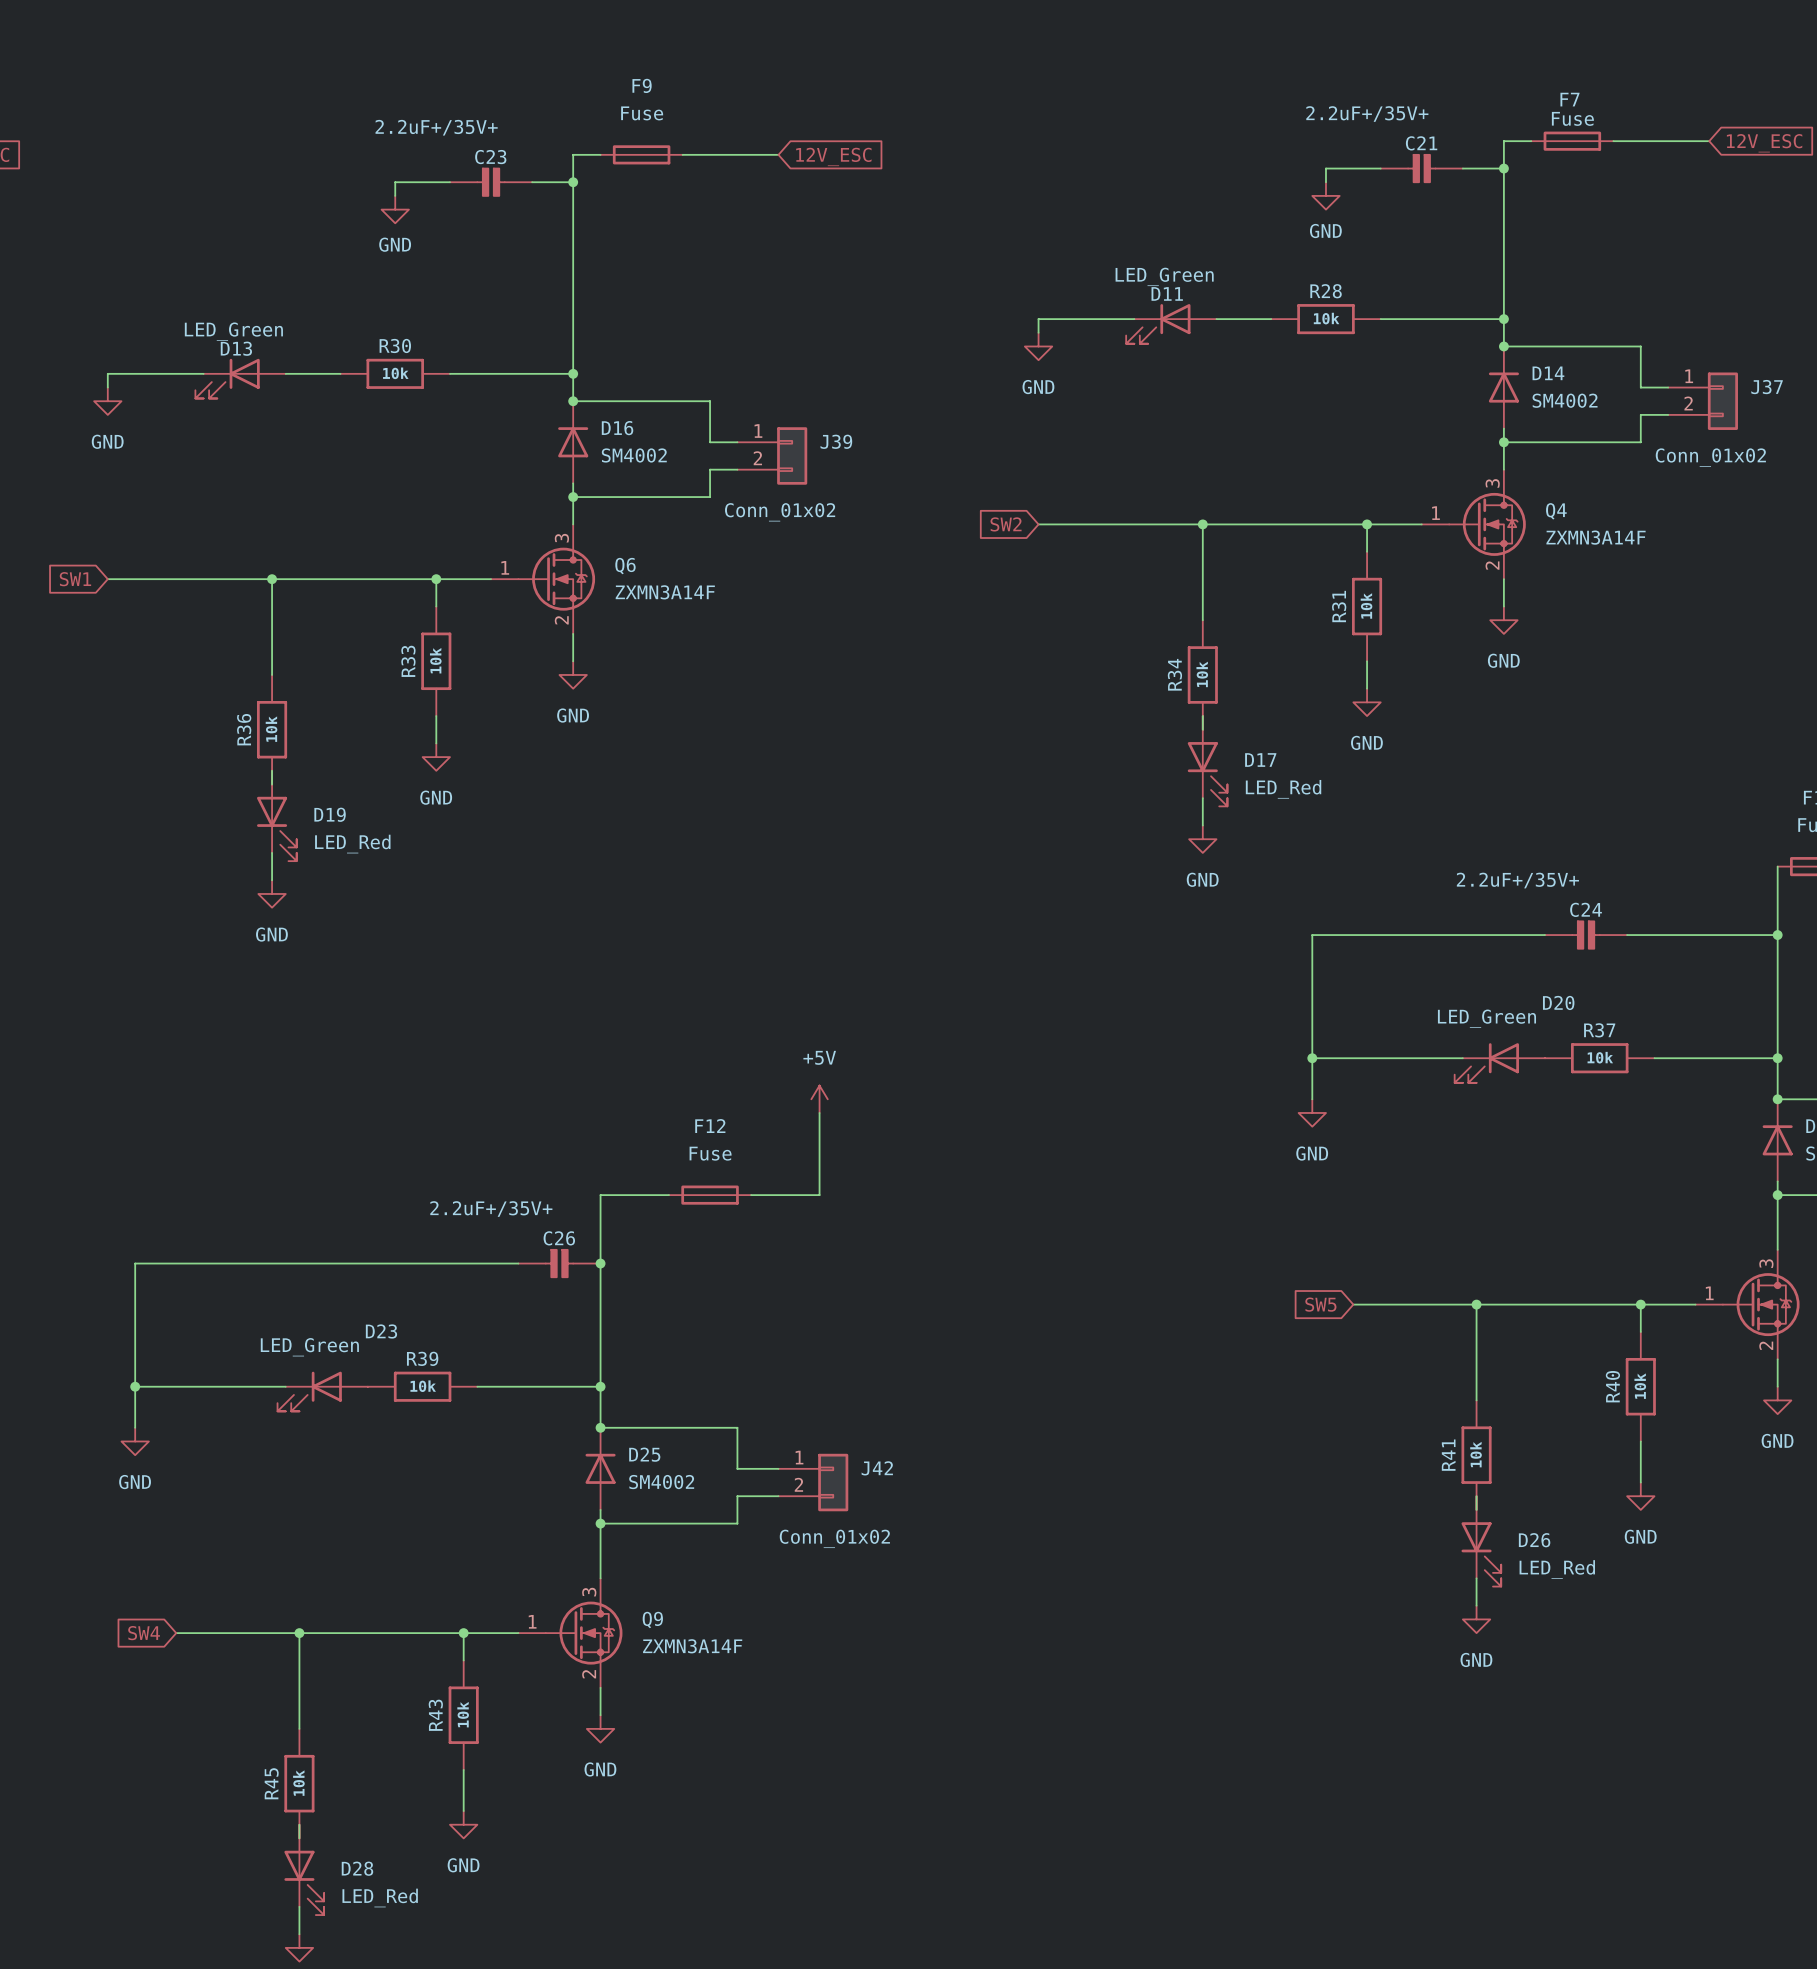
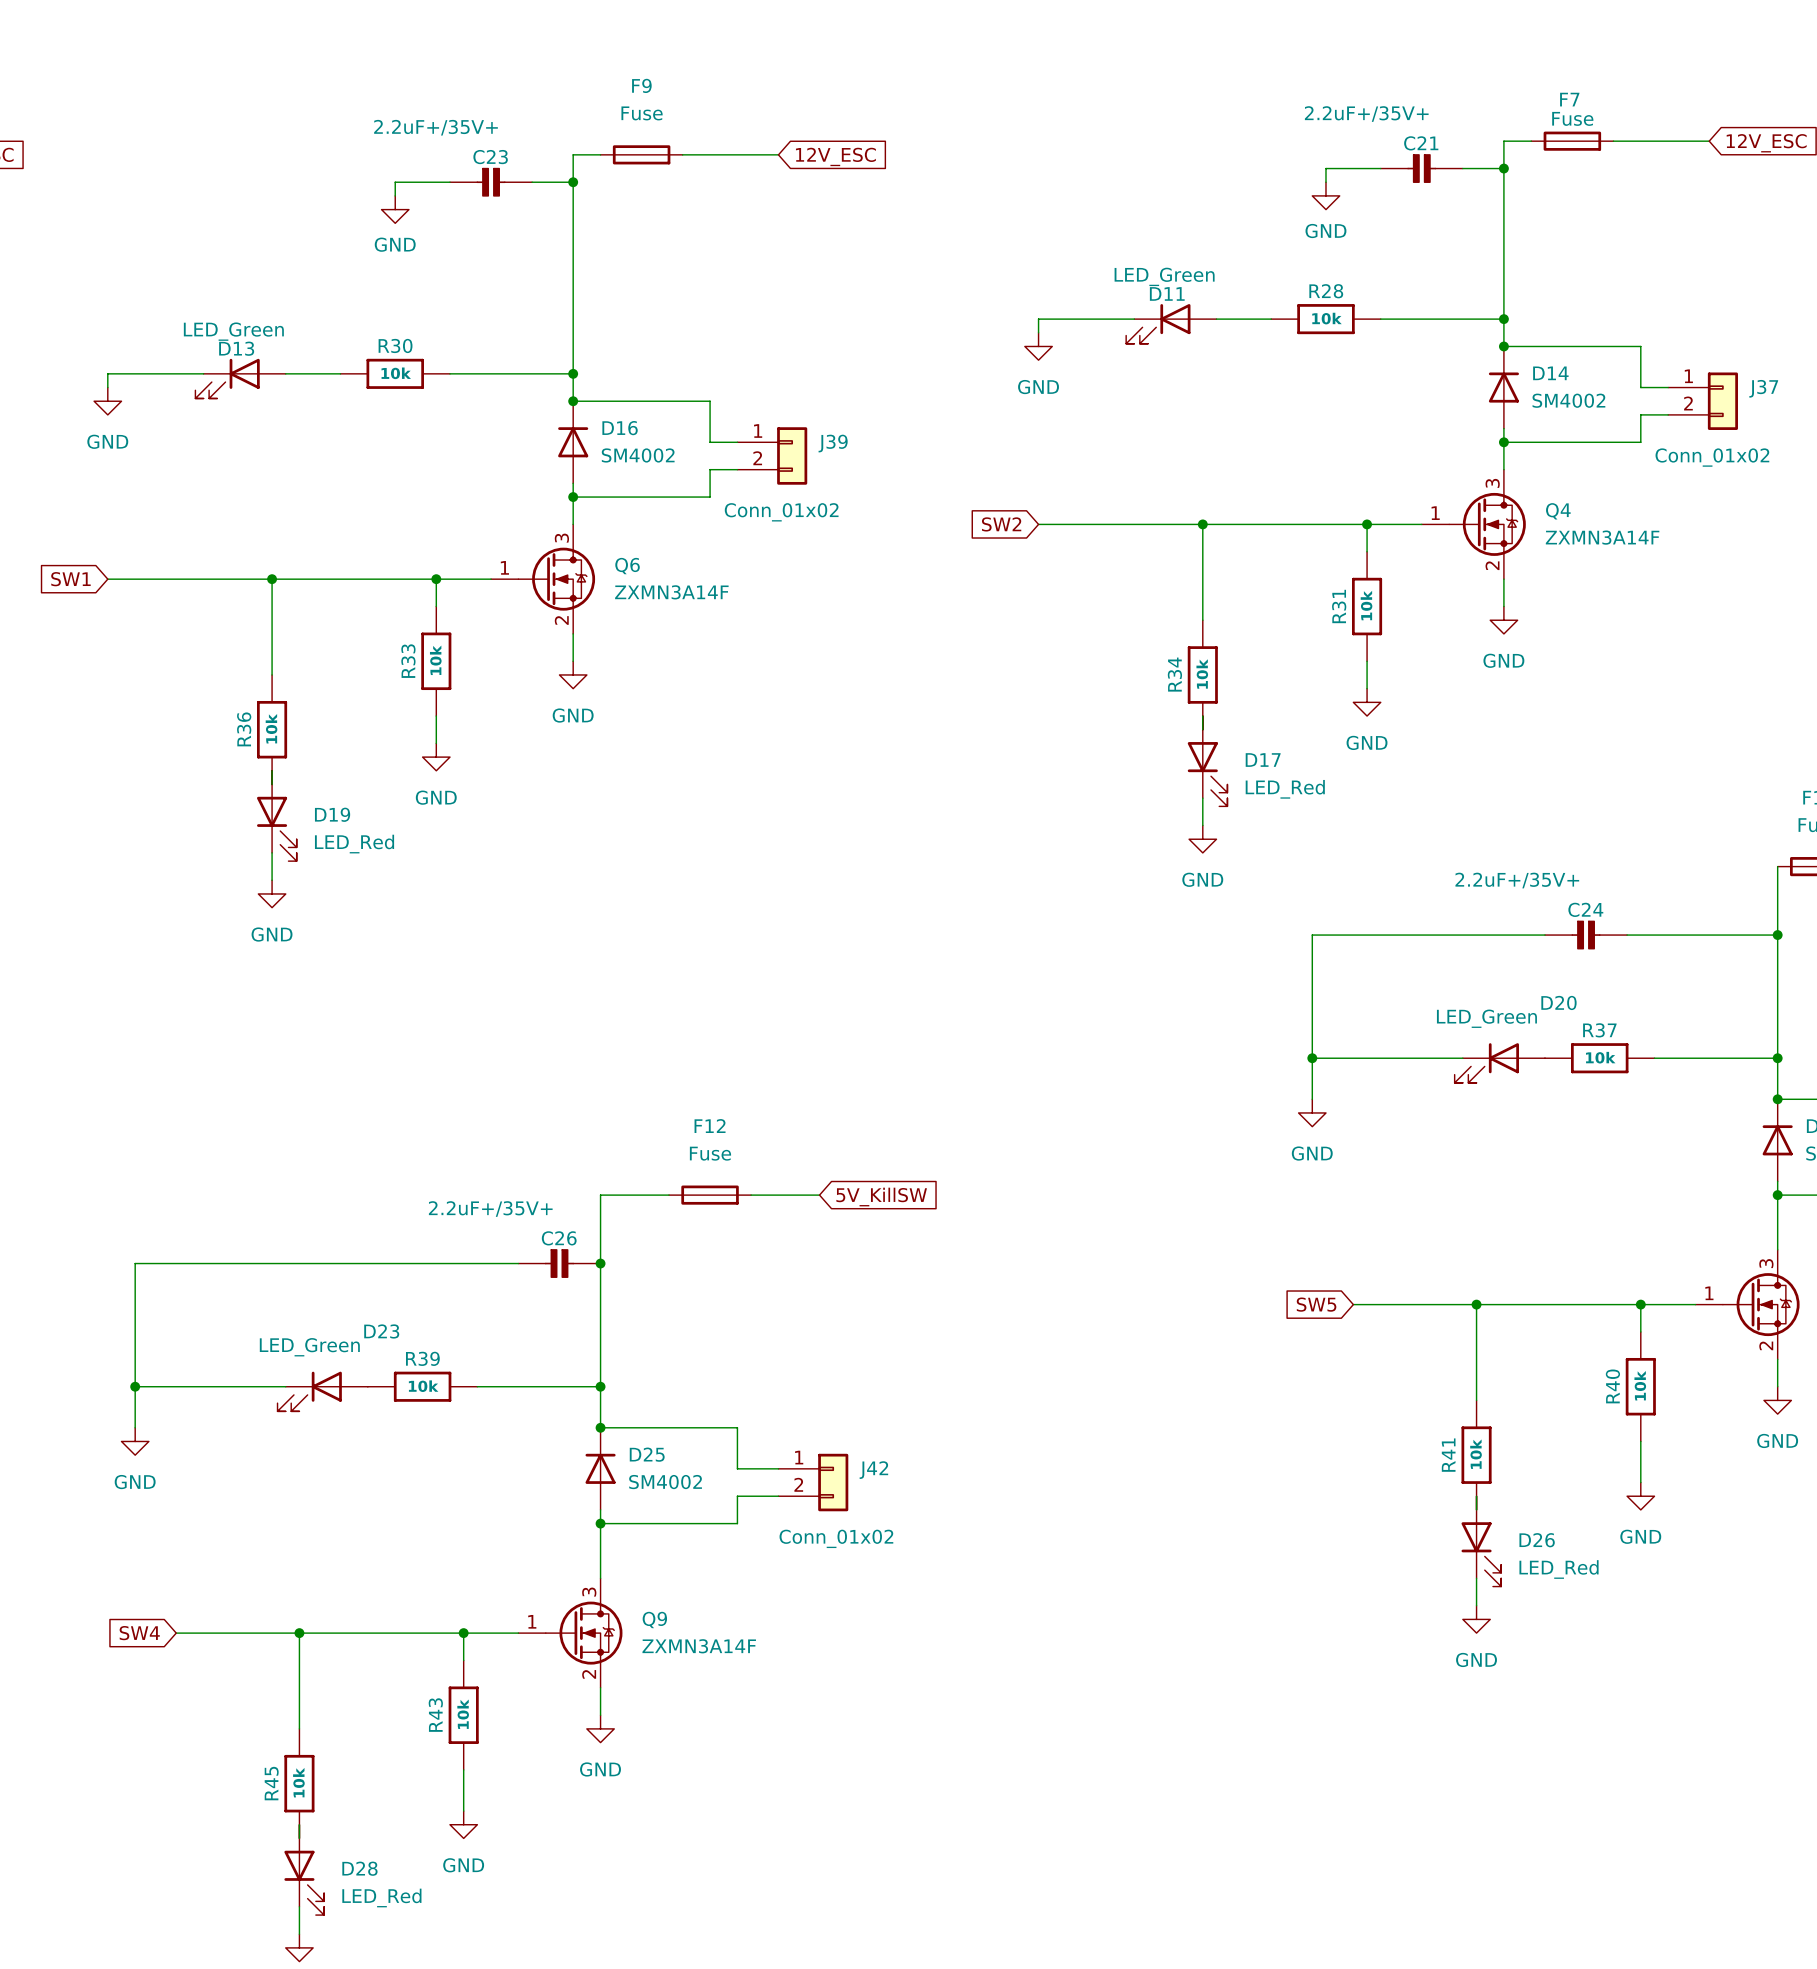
power symbol: +5V (819, 1099) -> none
wire: (819, 1112) (819, 1195) -> none
global label: none -> 5V_KillSW (881, 1197)

